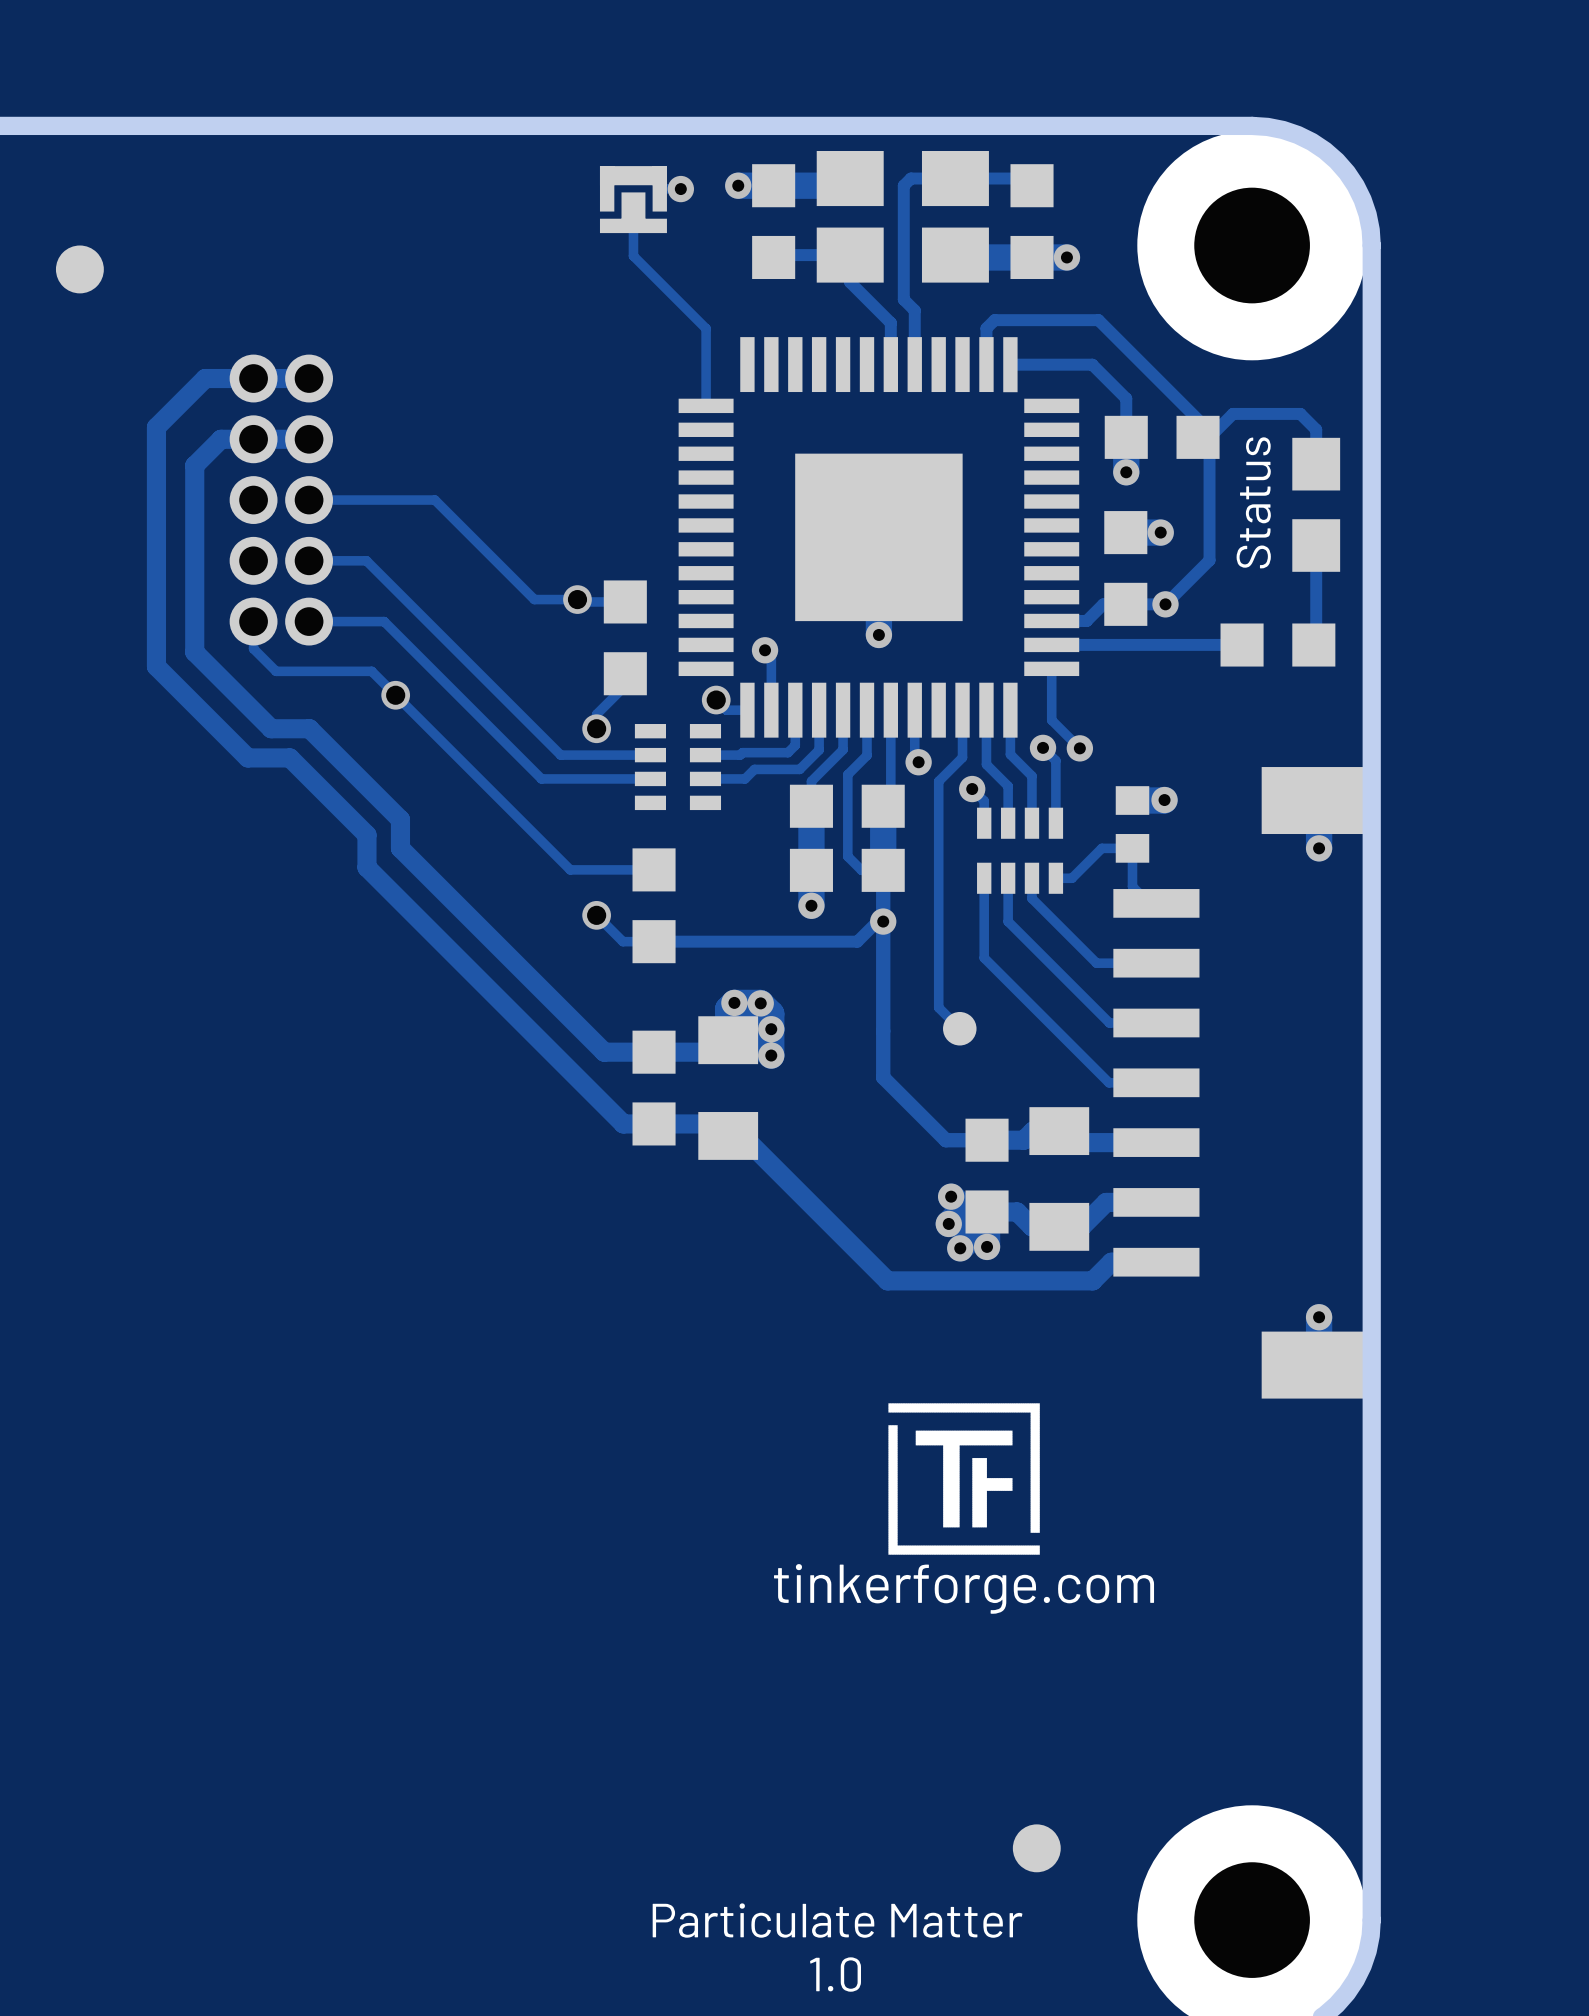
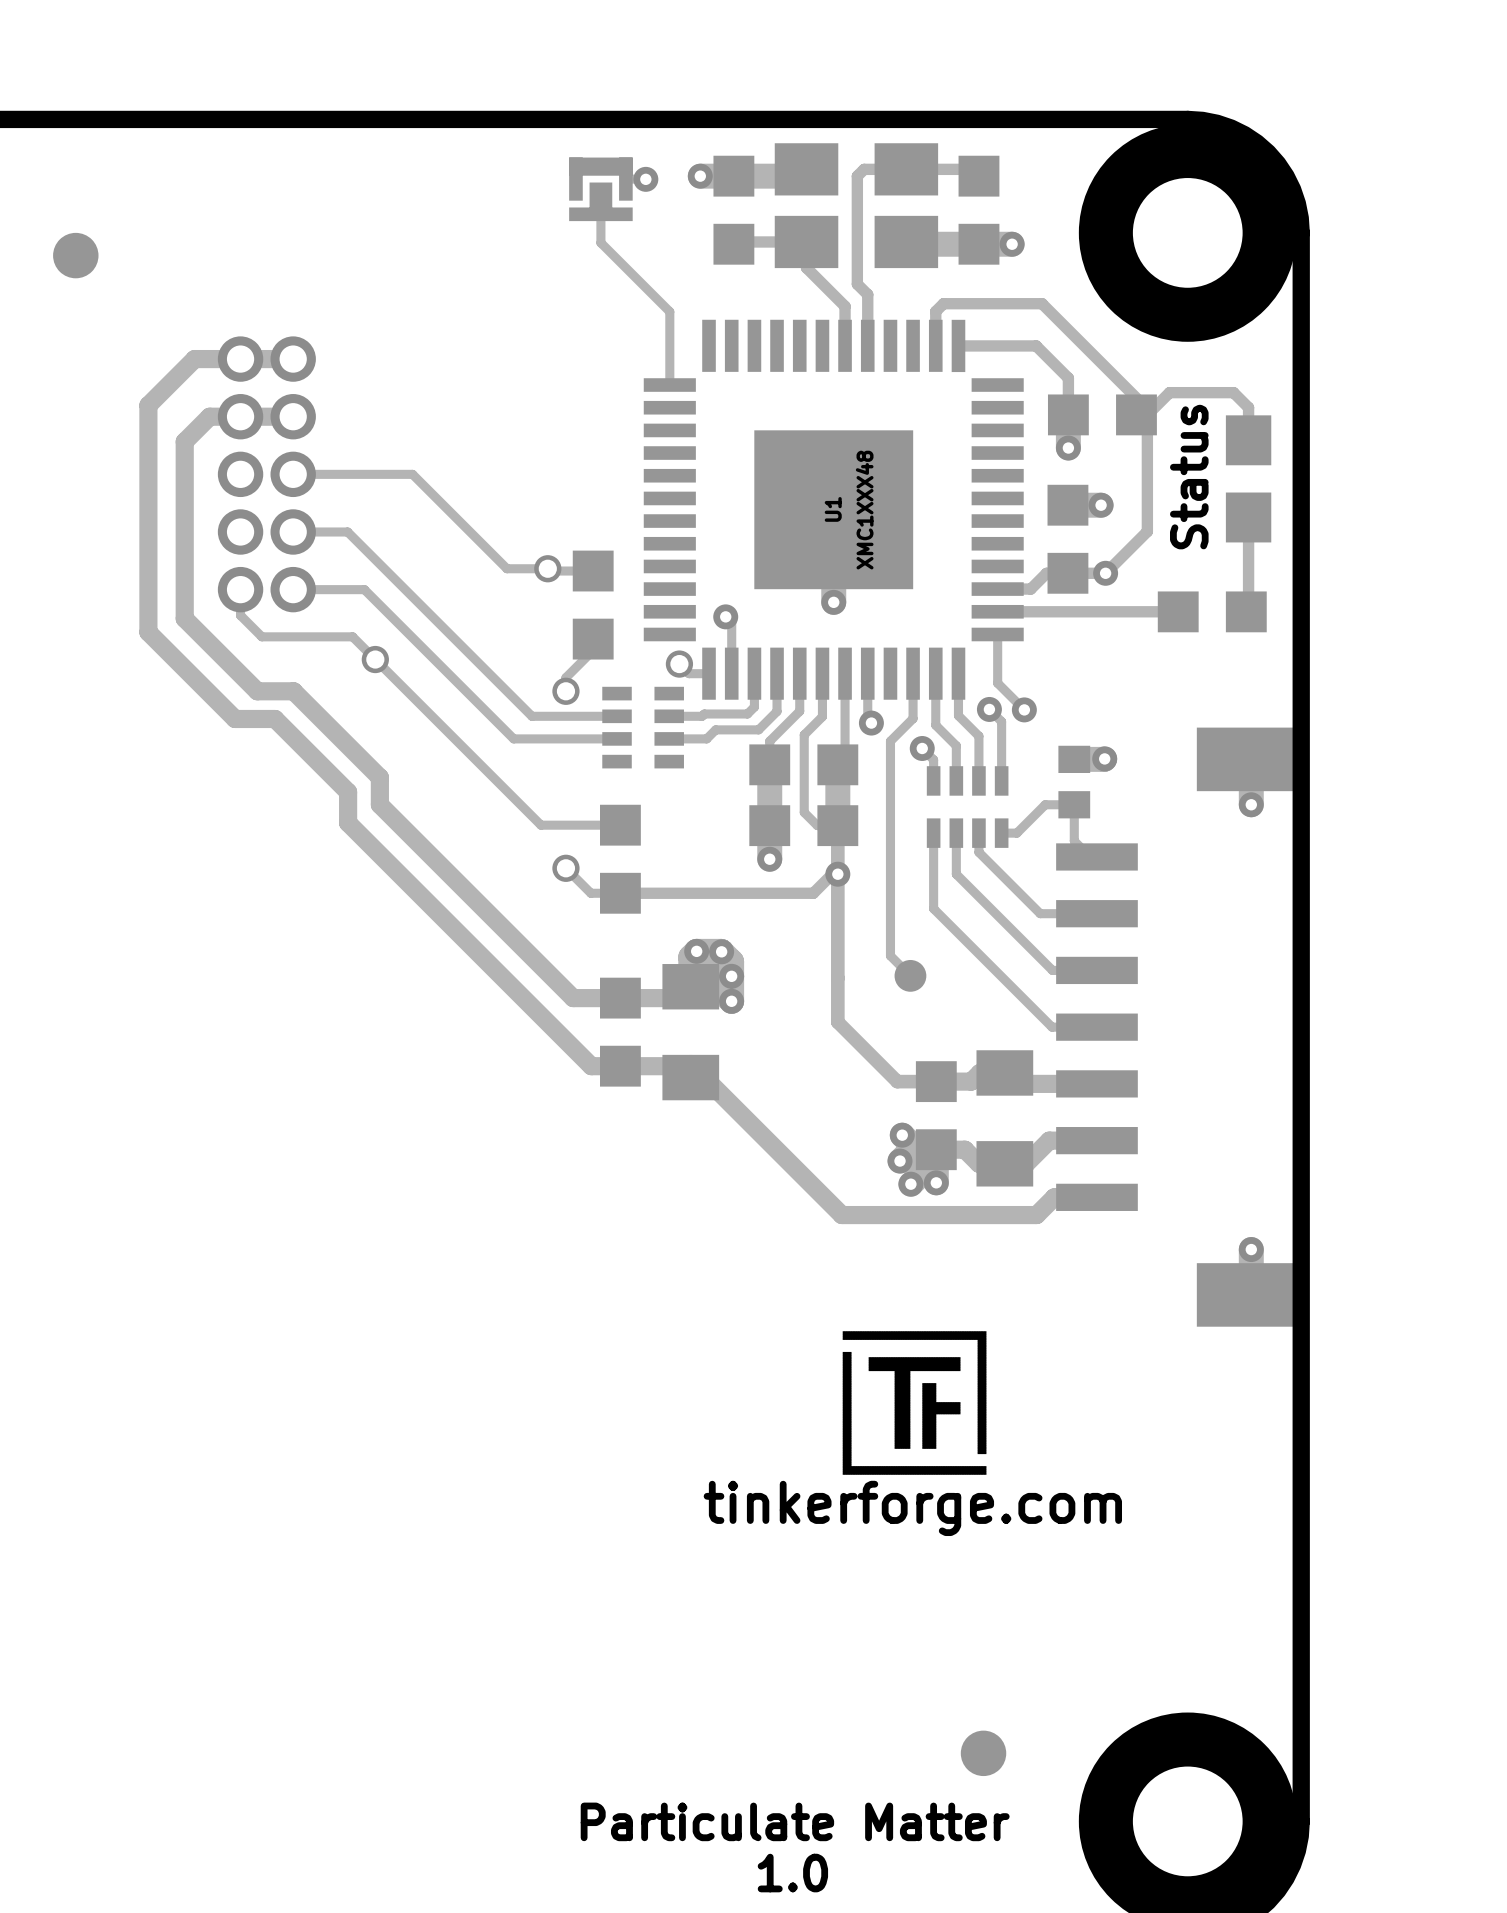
U1 name: none -> U1 (833, 509)
U1 value: none -> XMC1XXX48 (864, 510)

